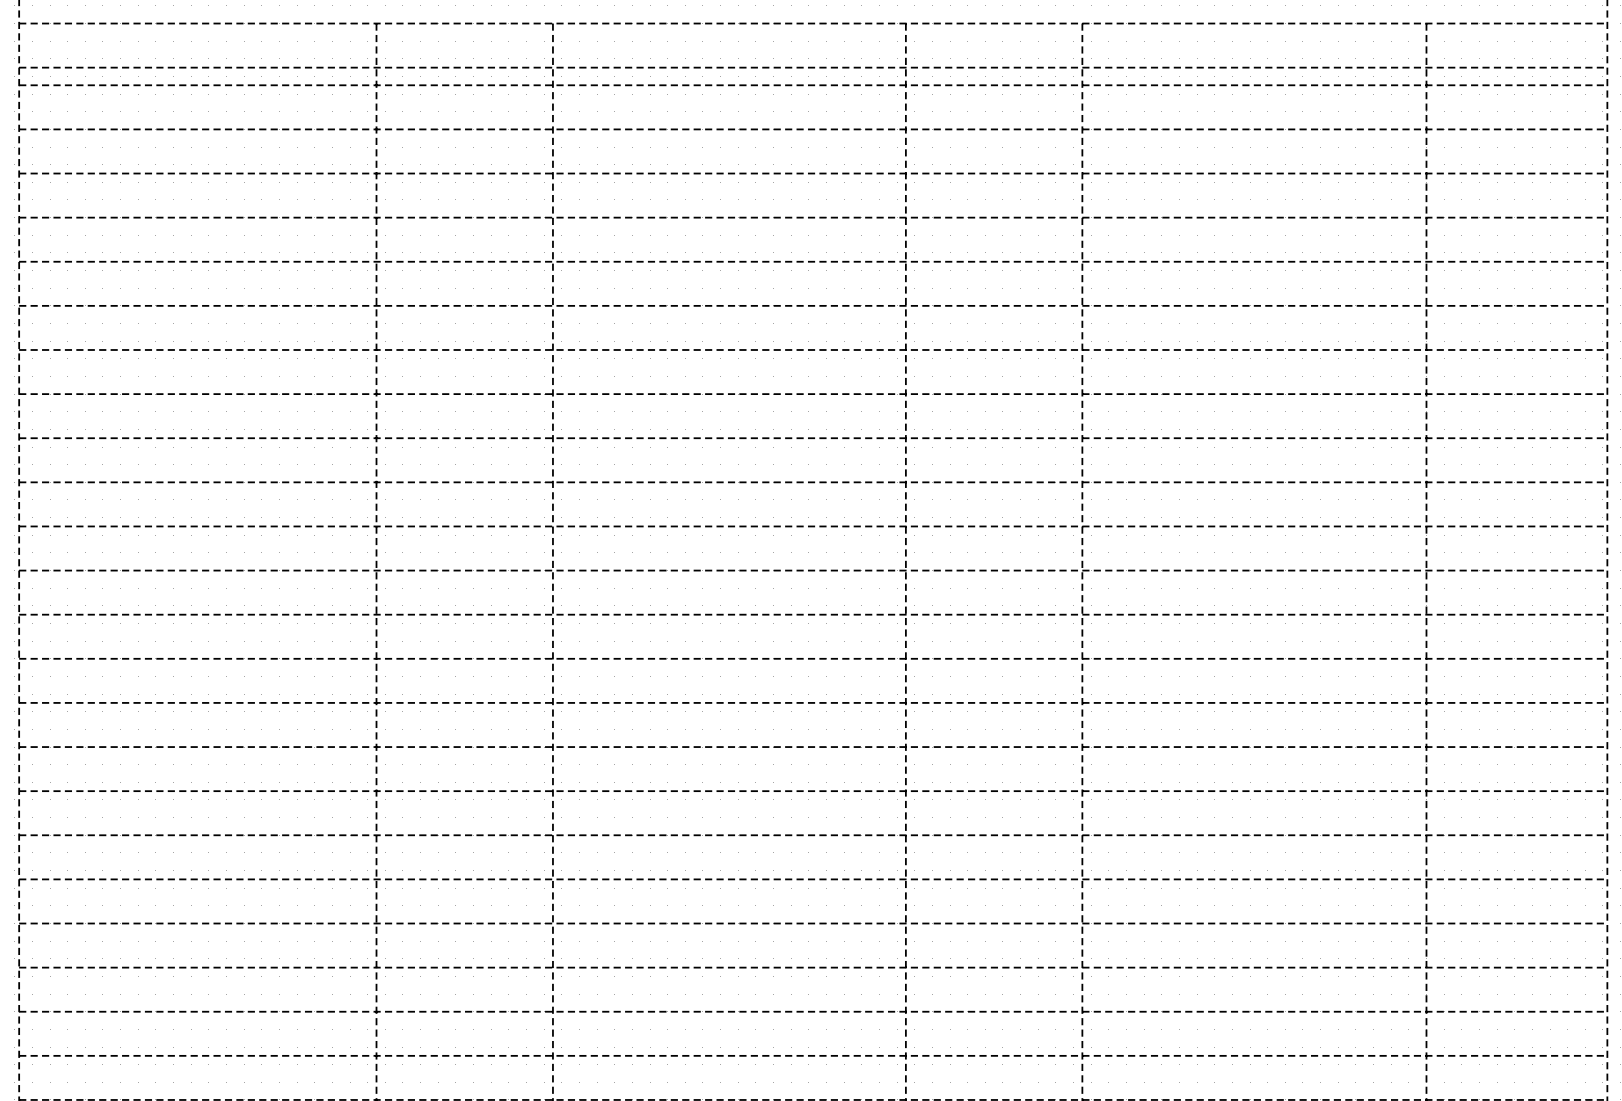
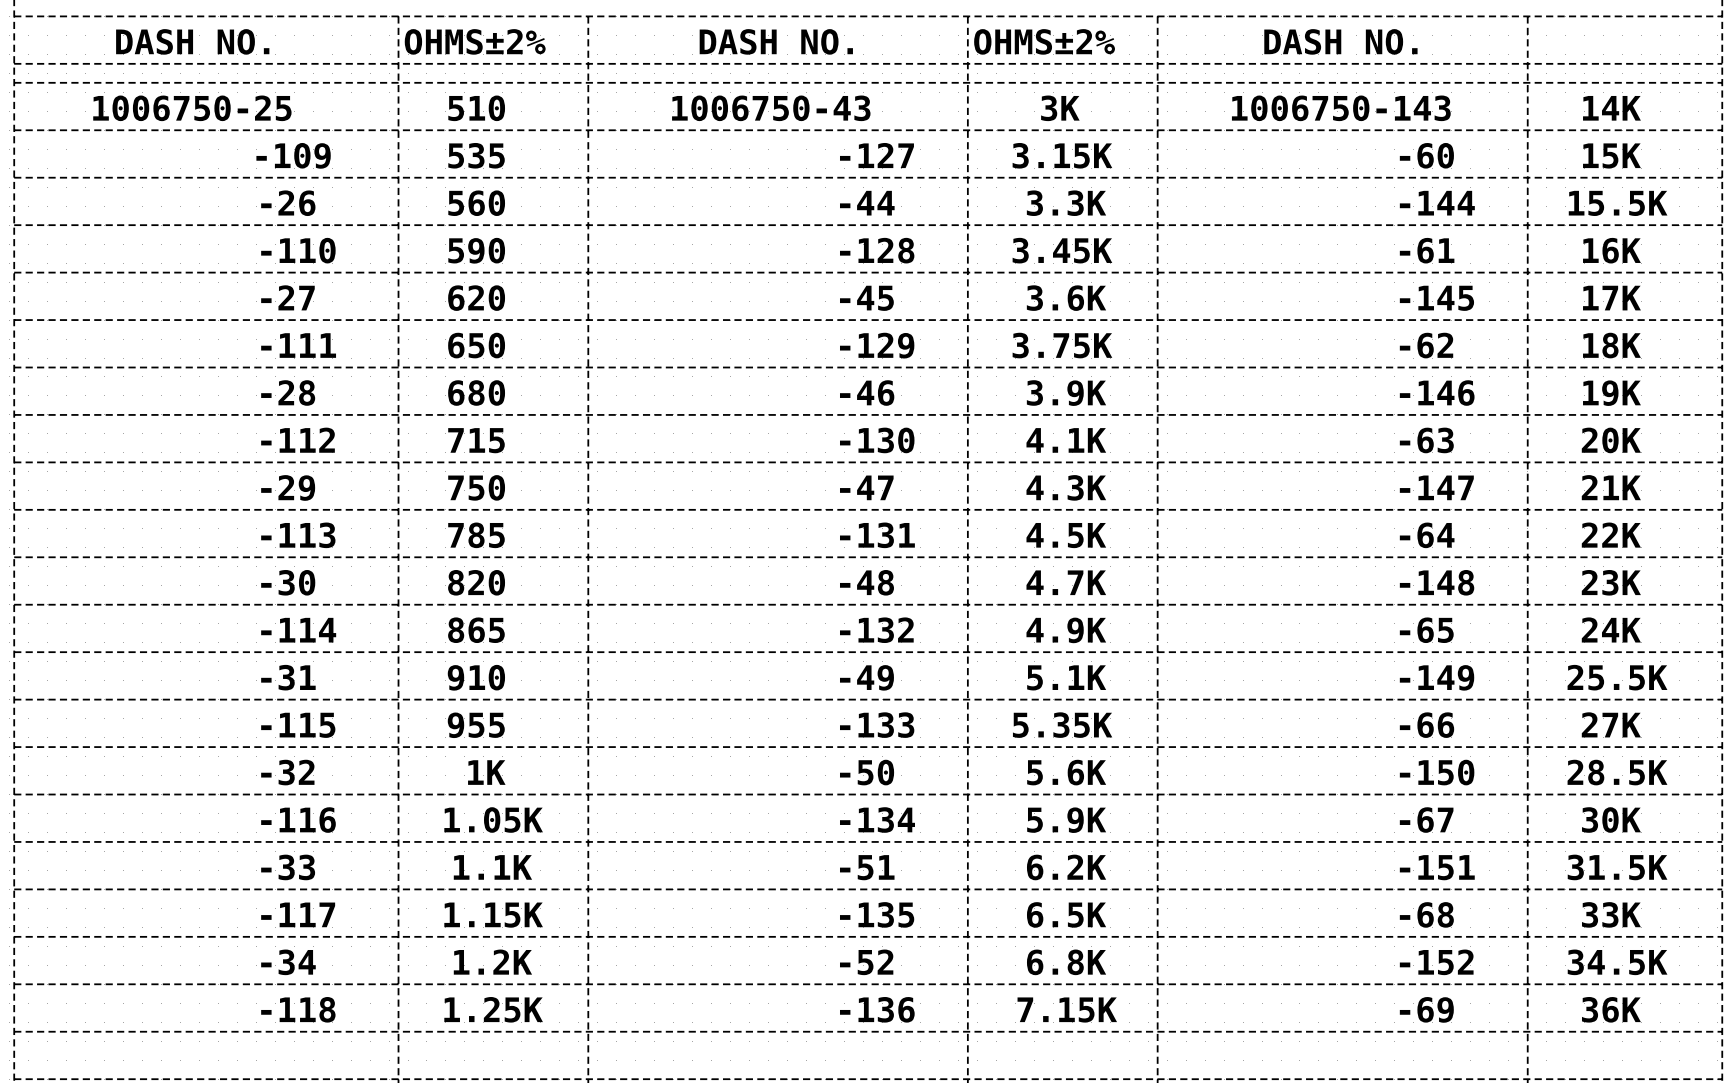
text: none -> DASH NO. (192, 41)
text: none -> OHMS±2% (475, 41)
text: none -> DASH NO. (776, 41)
text: none -> OHMS±2% (1044, 41)
text: none -> DASH NO. (1340, 41)
text: none -> 14K (1611, 108)
text: none -> 1006750-25 (192, 108)
text: none -> 510 (476, 108)
text: none -> 1006750-43 (771, 108)
text: none -> 3K (1060, 108)
text: none -> 1006750-143 (1341, 108)
text: none -> -127 (876, 155)
text: none -> -109 (293, 155)
text: none -> 535 (476, 155)
text: none -> 3.15K (1062, 155)
text: none -> -60 (1426, 155)
text: none -> 15K (1611, 155)
text: none -> -26 (288, 203)
text: none -> 560 (476, 203)
text: none -> -44 (867, 203)
text: none -> 3.3K (1066, 203)
text: none -> -144 (1437, 203)
text: none -> 15.5K (1618, 203)
text: none -> -110 (298, 250)
text: none -> 590 (476, 250)
text: none -> -128 (877, 250)
text: none -> 3.45K (1062, 250)
text: none -> -61 (1427, 250)
text: none -> 16K (1611, 250)
text: none -> -27 (287, 297)
text: none -> 620 (476, 298)
text: none -> -45 (866, 298)
text: none -> 3.6K (1066, 298)
text: none -> -145 (1436, 298)
text: none -> 17K (1611, 298)
text: none -> -111 (298, 345)
text: none -> 650 (476, 345)
text: none -> -129 (877, 345)
text: none -> 3.75K (1062, 345)
text: none -> -62 (1426, 345)
text: none -> 18K (1611, 345)
text: none -> -28 (288, 392)
text: none -> 680 (476, 393)
text: none -> -46 (867, 393)
text: none -> 3.9K (1066, 393)
text: none -> -146 (1437, 393)
text: none -> 19K (1611, 393)
text: none -> -112 (298, 440)
text: none -> -130 (877, 440)
text: none -> 4.1K (1066, 440)
text: none -> -63 (1426, 440)
text: none -> 20K (1611, 440)
text: none -> 715 (476, 440)
text: none -> 750 (476, 487)
text: none -> -47 (866, 487)
text: none -> 4.3K (1066, 487)
text: none -> -147 (1436, 487)
text: none -> 21K (1611, 487)
text: none -> -29 (288, 487)
text: none -> 22K (1611, 535)
text: none -> -113 (298, 535)
text: none -> 785 (476, 535)
text: none -> -131 (877, 535)
text: none -> 4.5K (1066, 535)
text: none -> -64 (1427, 535)
text: none -> -30 (288, 582)
text: none -> 820 (476, 582)
text: none -> -48 (867, 582)
text: none -> 4.7K (1066, 582)
text: none -> -148 (1437, 582)
text: none -> 23K (1611, 582)
text: none -> -114 (298, 630)
text: none -> 865 (476, 630)
text: none -> -132 (876, 630)
text: none -> 4.9K (1066, 630)
text: none -> -65 (1426, 630)
text: none -> 24K (1611, 629)
text: none -> -31 (288, 677)
text: none -> 910 (476, 677)
text: none -> -49 (866, 677)
text: none -> 5.1K (1066, 677)
text: none -> -149 (1437, 677)
text: none -> 25.5K (1617, 677)
text: none -> -115 (298, 725)
text: none -> 955 (476, 725)
text: none -> -133 (877, 725)
text: none -> 5.35K (1062, 725)
text: none -> -66 (1427, 725)
text: none -> 27K (1611, 724)
text: none -> -32 (287, 772)
text: none -> 1K (486, 772)
text: none -> -50 (867, 772)
text: none -> 5.6K (1066, 772)
text: none -> -150 (1437, 772)
text: none -> 28.5K (1617, 772)
text: none -> -116 (298, 820)
text: none -> 1.05K (493, 820)
text: none -> -134 (877, 820)
text: none -> 5.9K (1066, 820)
text: none -> -67 (1426, 820)
text: none -> 30K (1611, 820)
text: none -> -33 (288, 867)
text: none -> 1.1K (492, 867)
text: none -> 6.2K (1066, 867)
text: none -> 31.5K (1617, 867)
text: none -> -51 (867, 867)
text: none -> -151 (1437, 867)
text: none -> -117 (298, 914)
text: none -> -135 (877, 914)
text: none -> -68 (1426, 914)
text: none -> 33K (1611, 914)
text: none -> 1.15K (493, 915)
text: none -> 6.5K (1066, 914)
text: none -> 1.2K (492, 962)
text: none -> -34 (288, 962)
text: none -> -52 (866, 962)
text: none -> 6.8K (1066, 962)
text: none -> -152 (1436, 962)
text: none -> 34.5K (1617, 962)
text: none -> -118 (298, 1009)
text: none -> 1.25K (493, 1009)
text: none -> -136 (877, 1009)
text: none -> 7.15K (1067, 1010)
text: none -> -69 (1426, 1009)
text: none -> 36K (1611, 1009)

